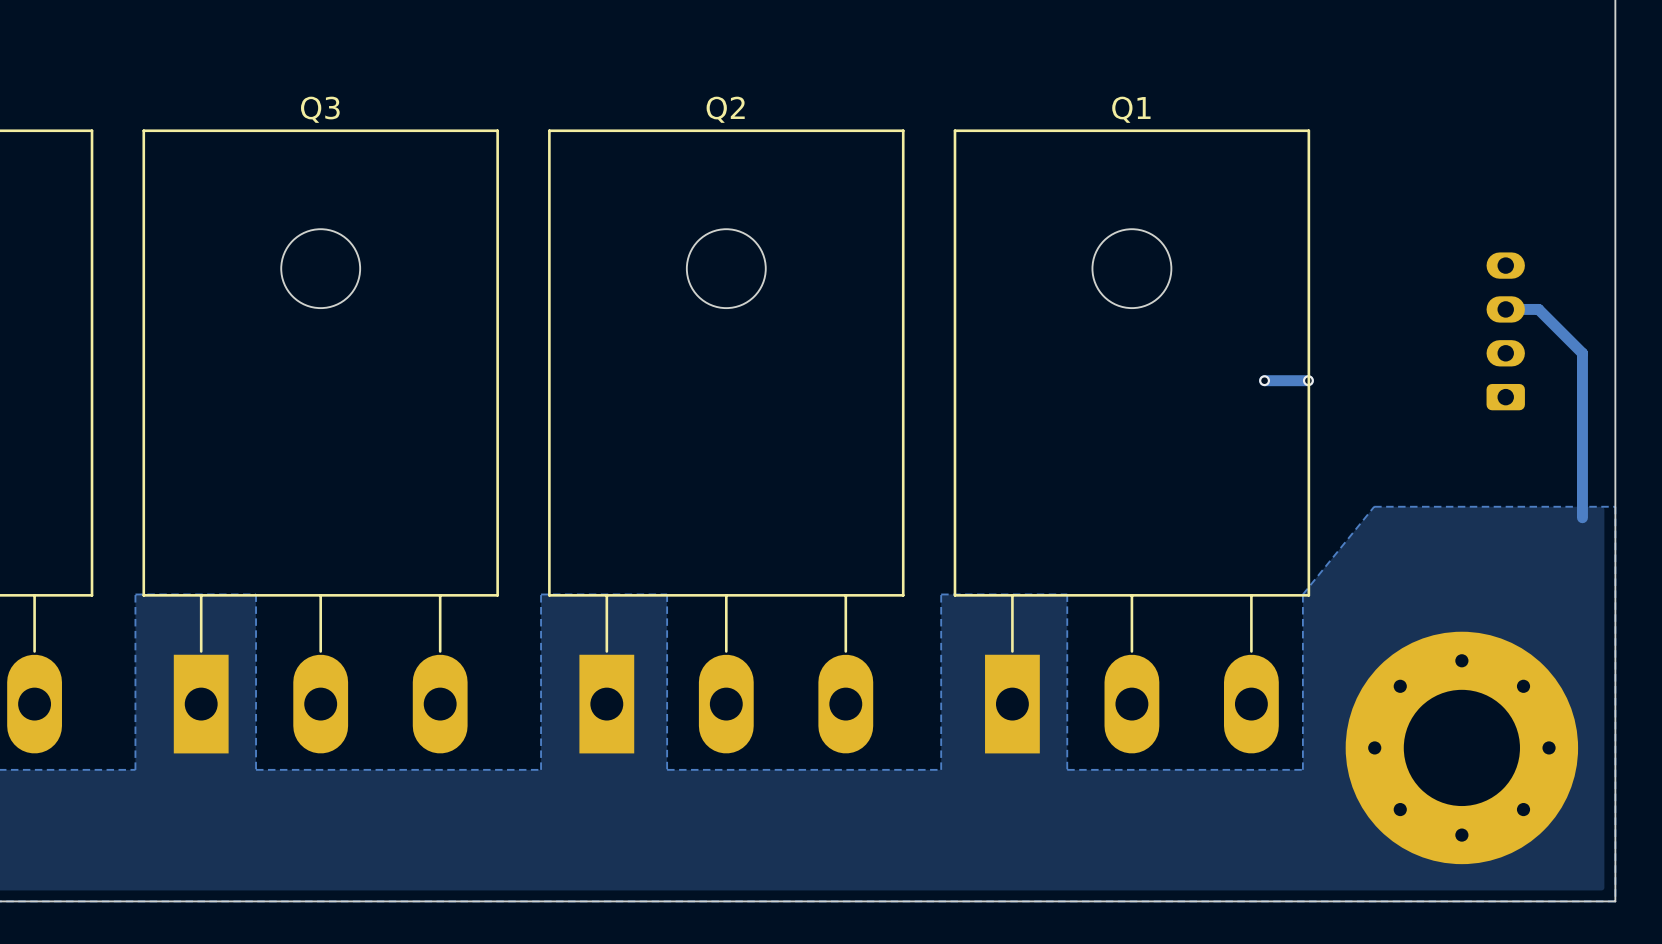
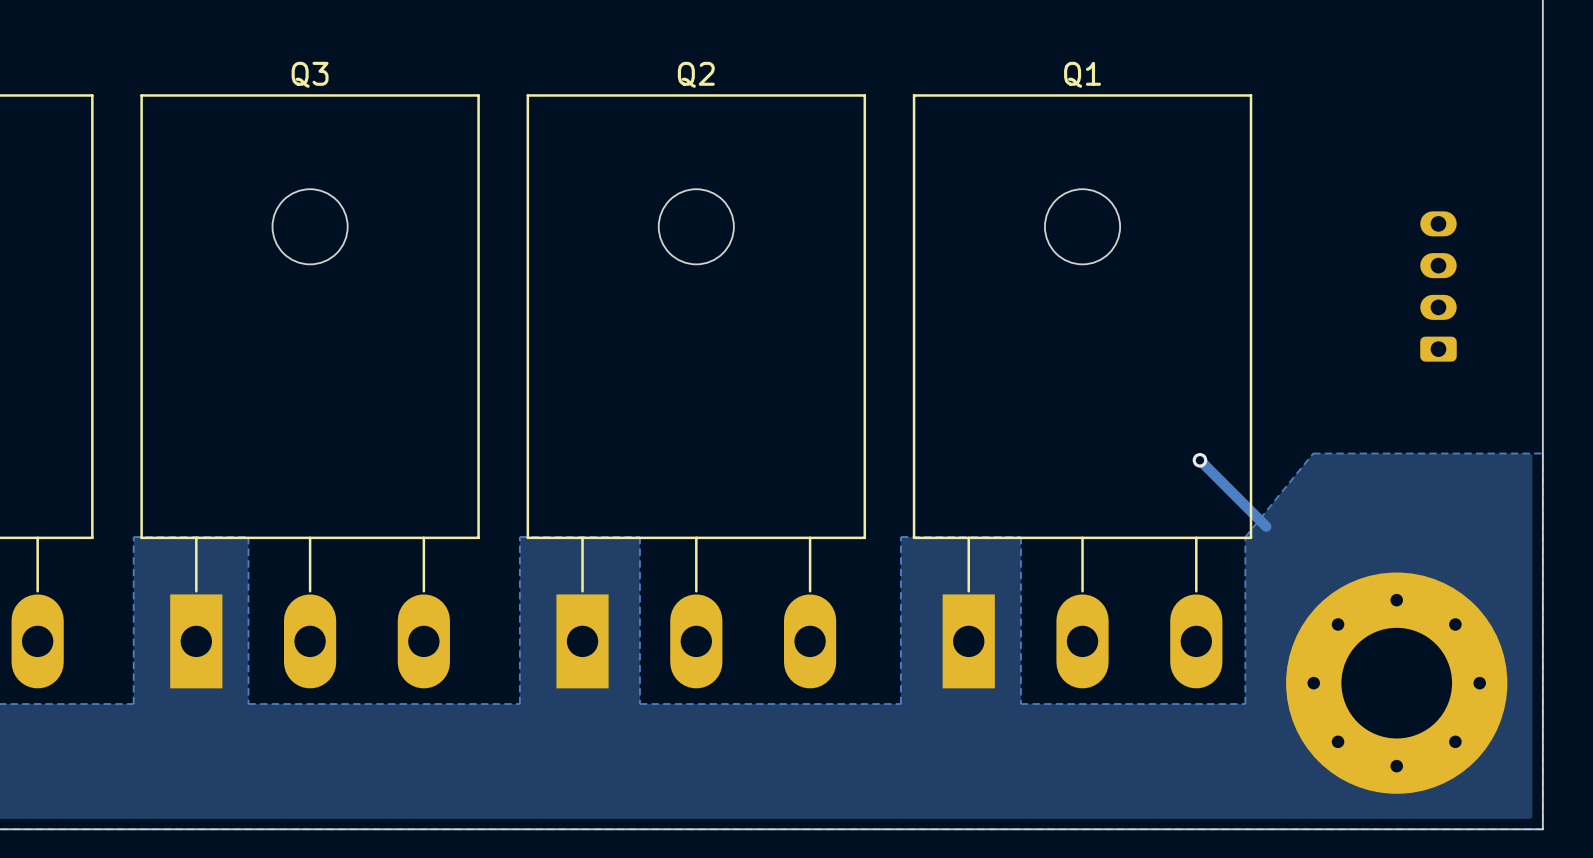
track: (1506, 309) (1538, 309) (1582, 353) (1582, 517) -> none
via: (1264, 380) -> none
track: (1308, 380) (1264, 380) -> none
via: (1308, 380) -> none
track: none -> (1199, 460) (1266, 526)
via: none -> (1199, 460)

